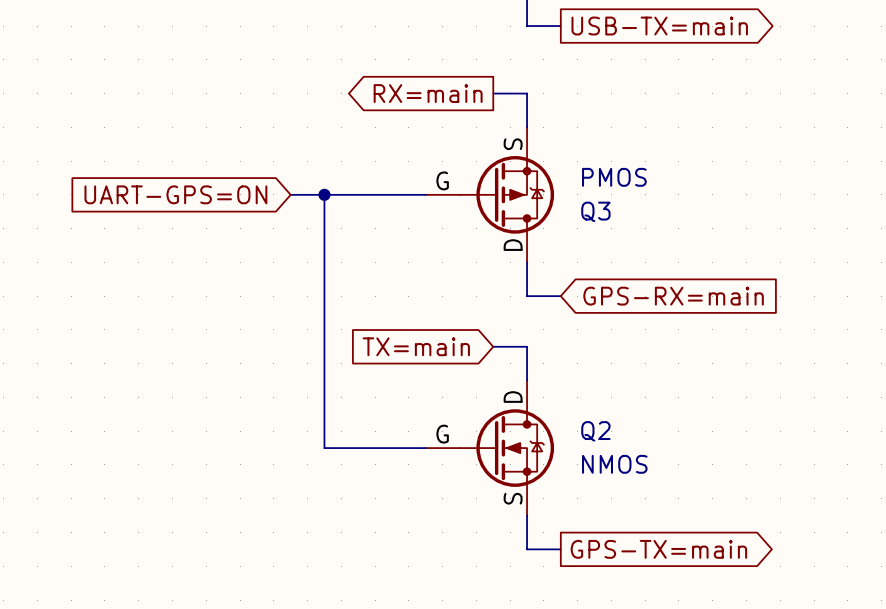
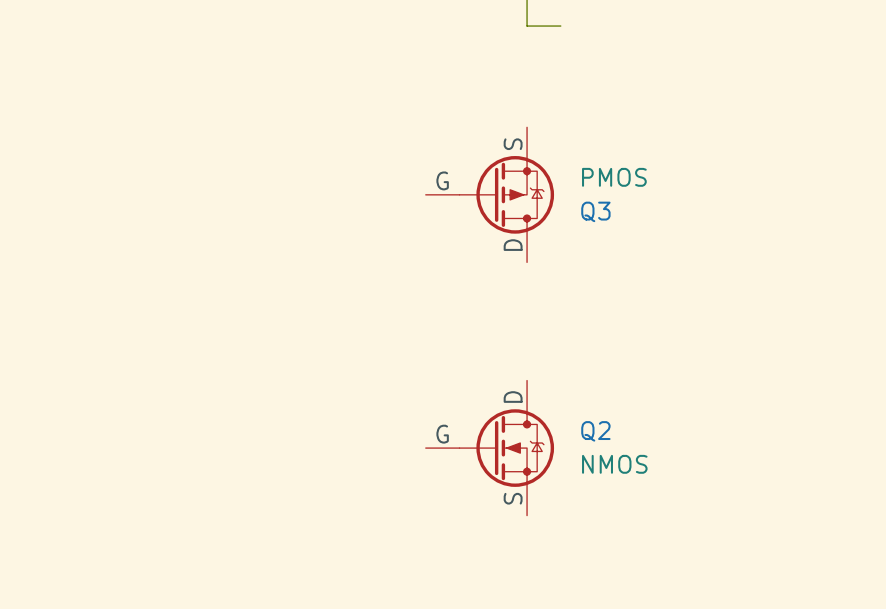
global label: USB-TX=main (659, 26) -> none
global label: RX=main (428, 93) -> none
wire: (493, 93) (527, 93) (527, 127) -> none
global label: UART-GPS=ON (175, 194) -> none
wire: (290, 194) (425, 194) -> none
wire: (324, 194) (324, 448) (425, 448) -> none
junction: (324, 194) -> none
wire: (527, 262) (527, 296) (560, 296) -> none
global label: GPS-RX=main (673, 296) -> none
global label: TX=main (416, 346) -> none
wire: (493, 346) (527, 346) (527, 380) -> none
wire: (527, 515) (527, 549) (560, 549) -> none
global label: GPS-TX=main (658, 549) -> none

